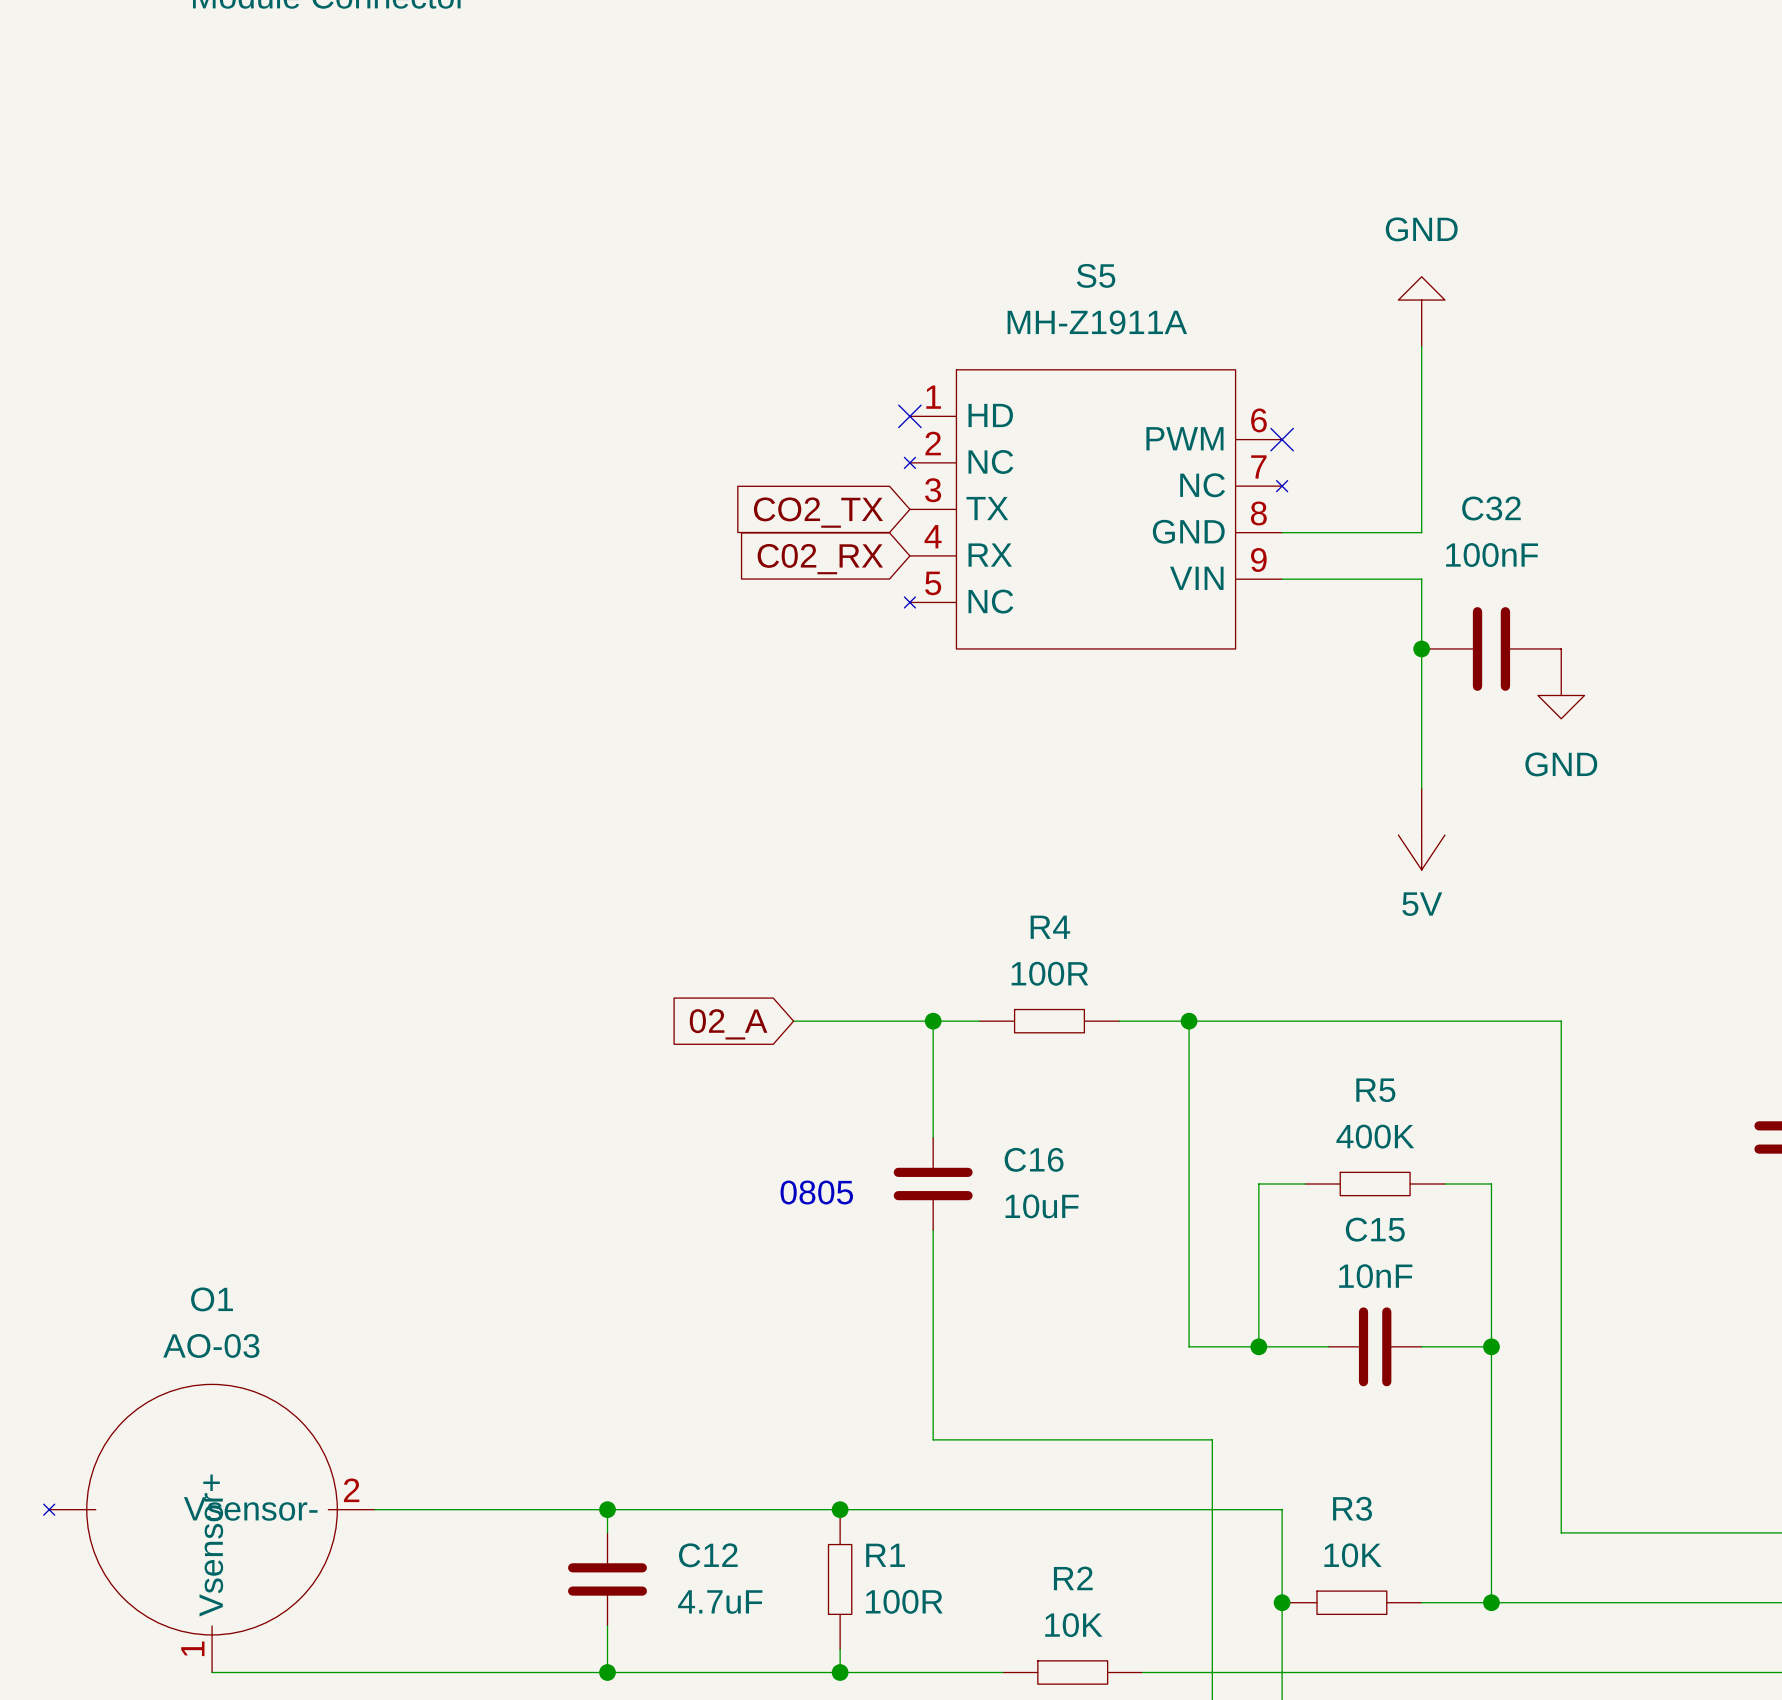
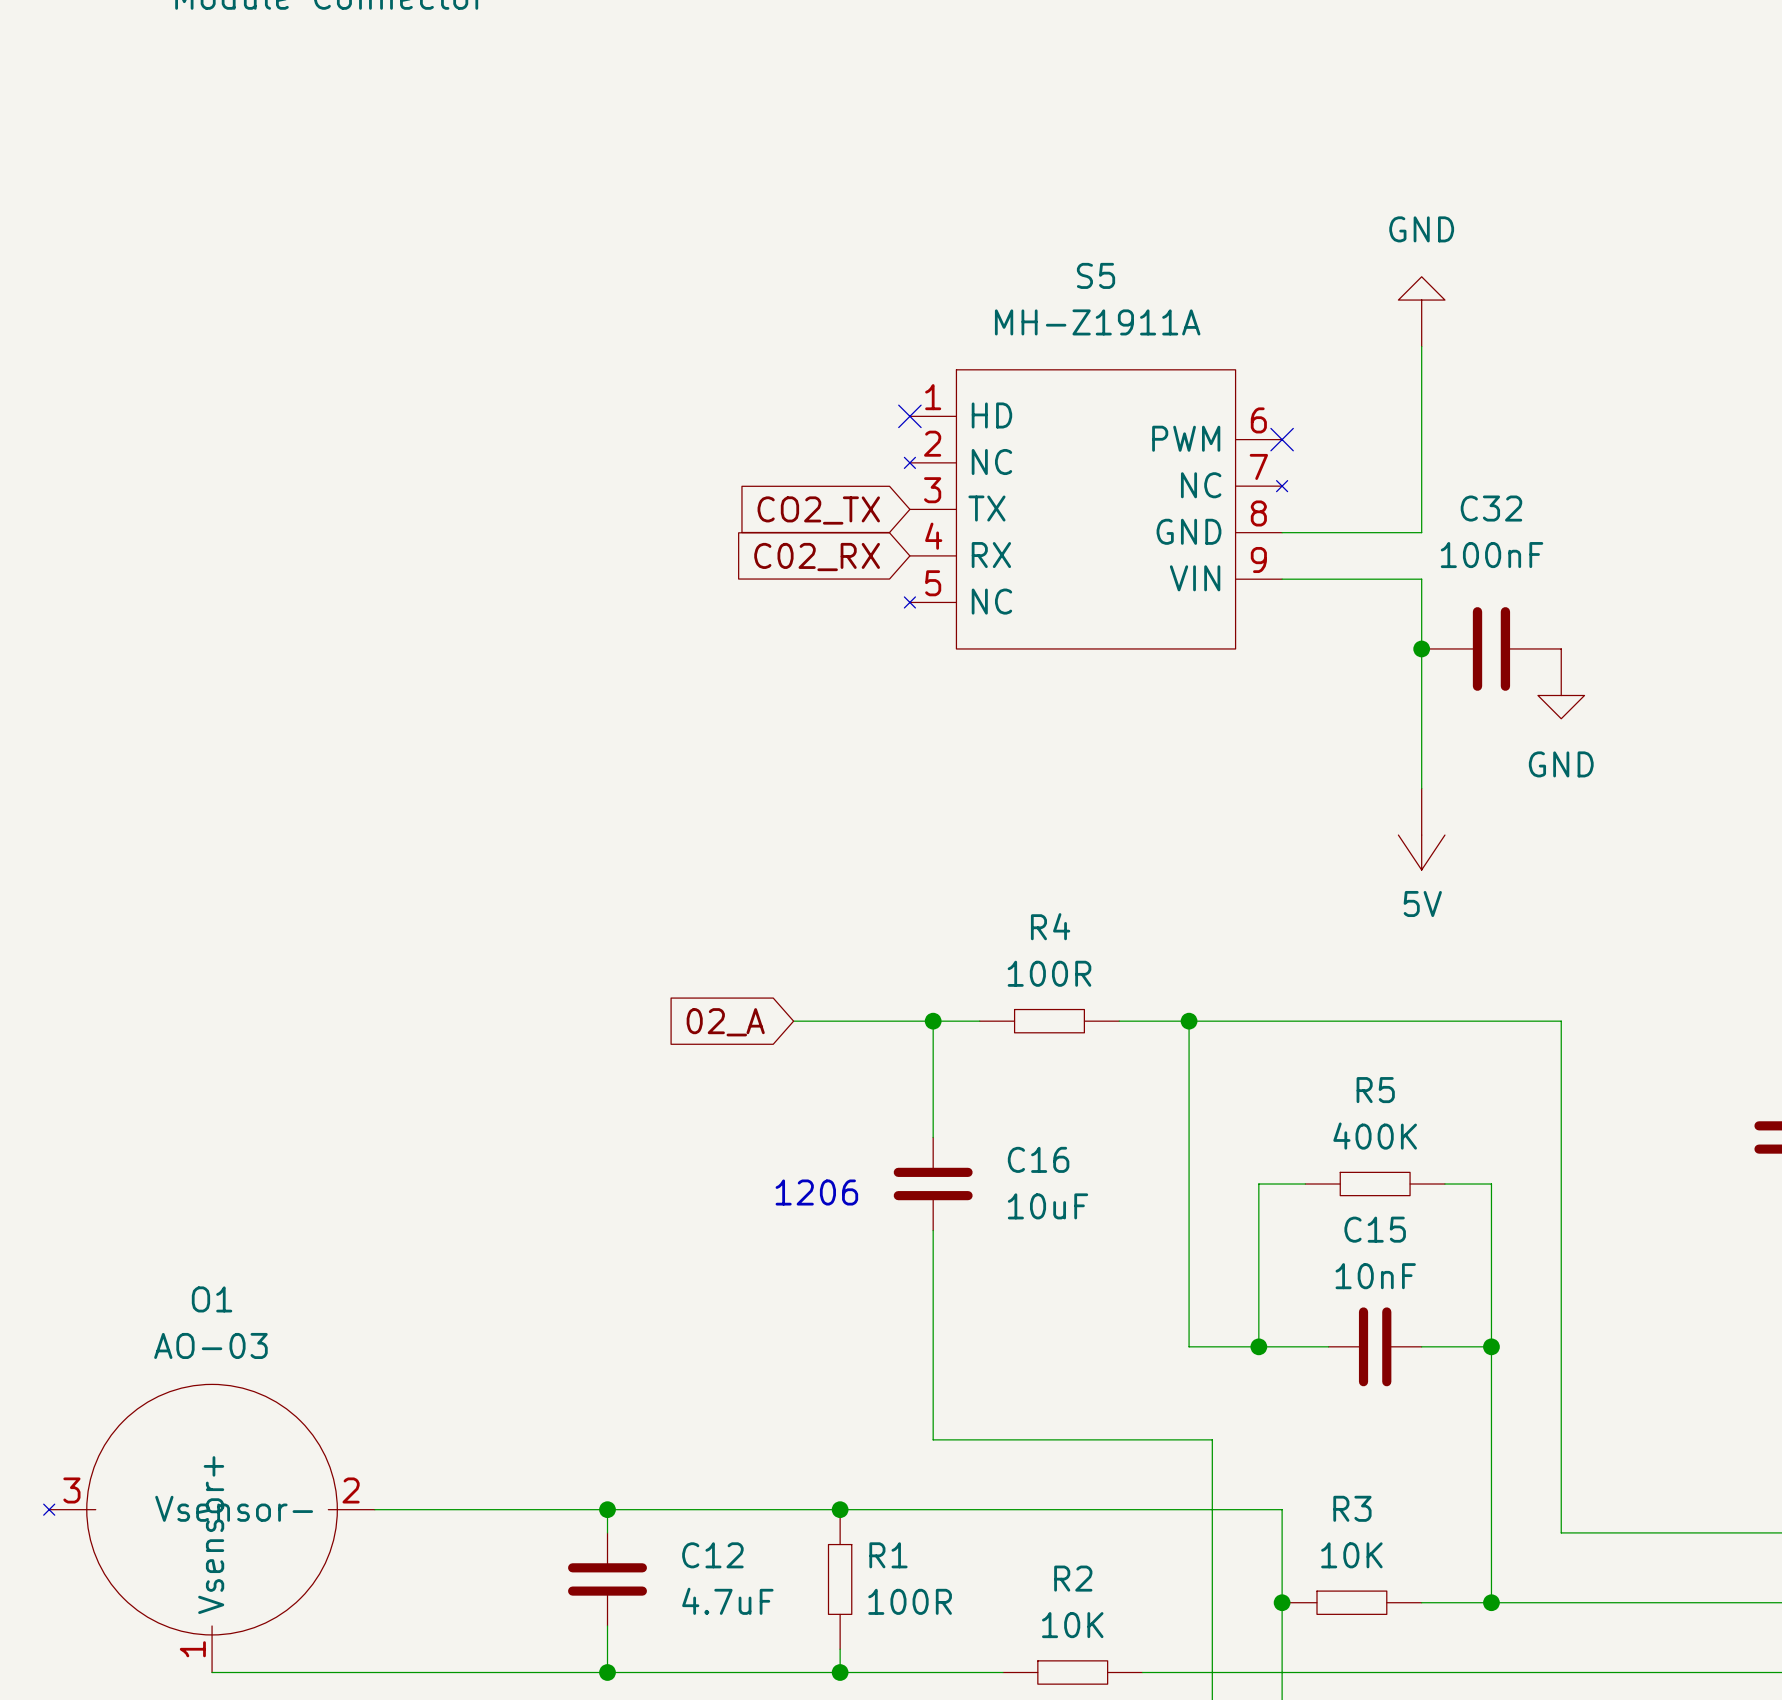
text: 0805 (816, 1192) -> 1206 (816, 1192)
O1 pin number: none -> 3 (71, 1490)

